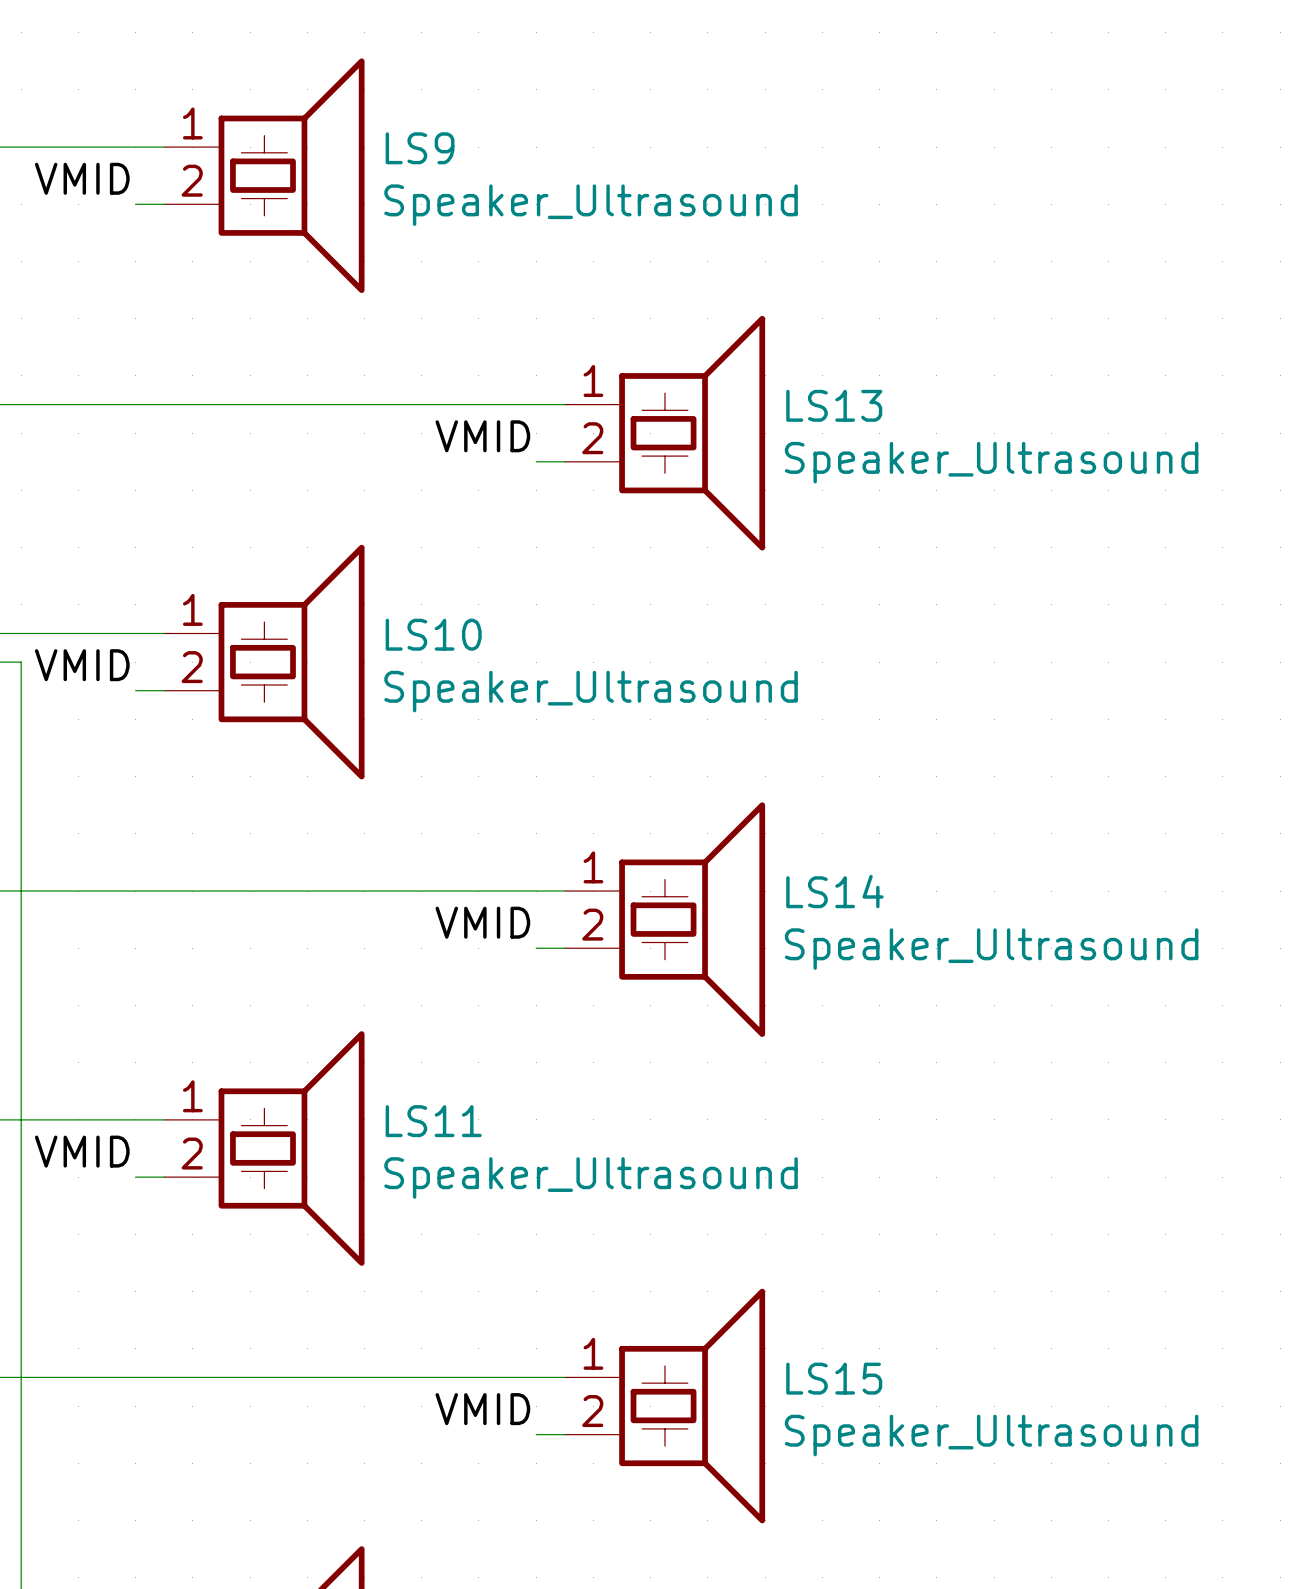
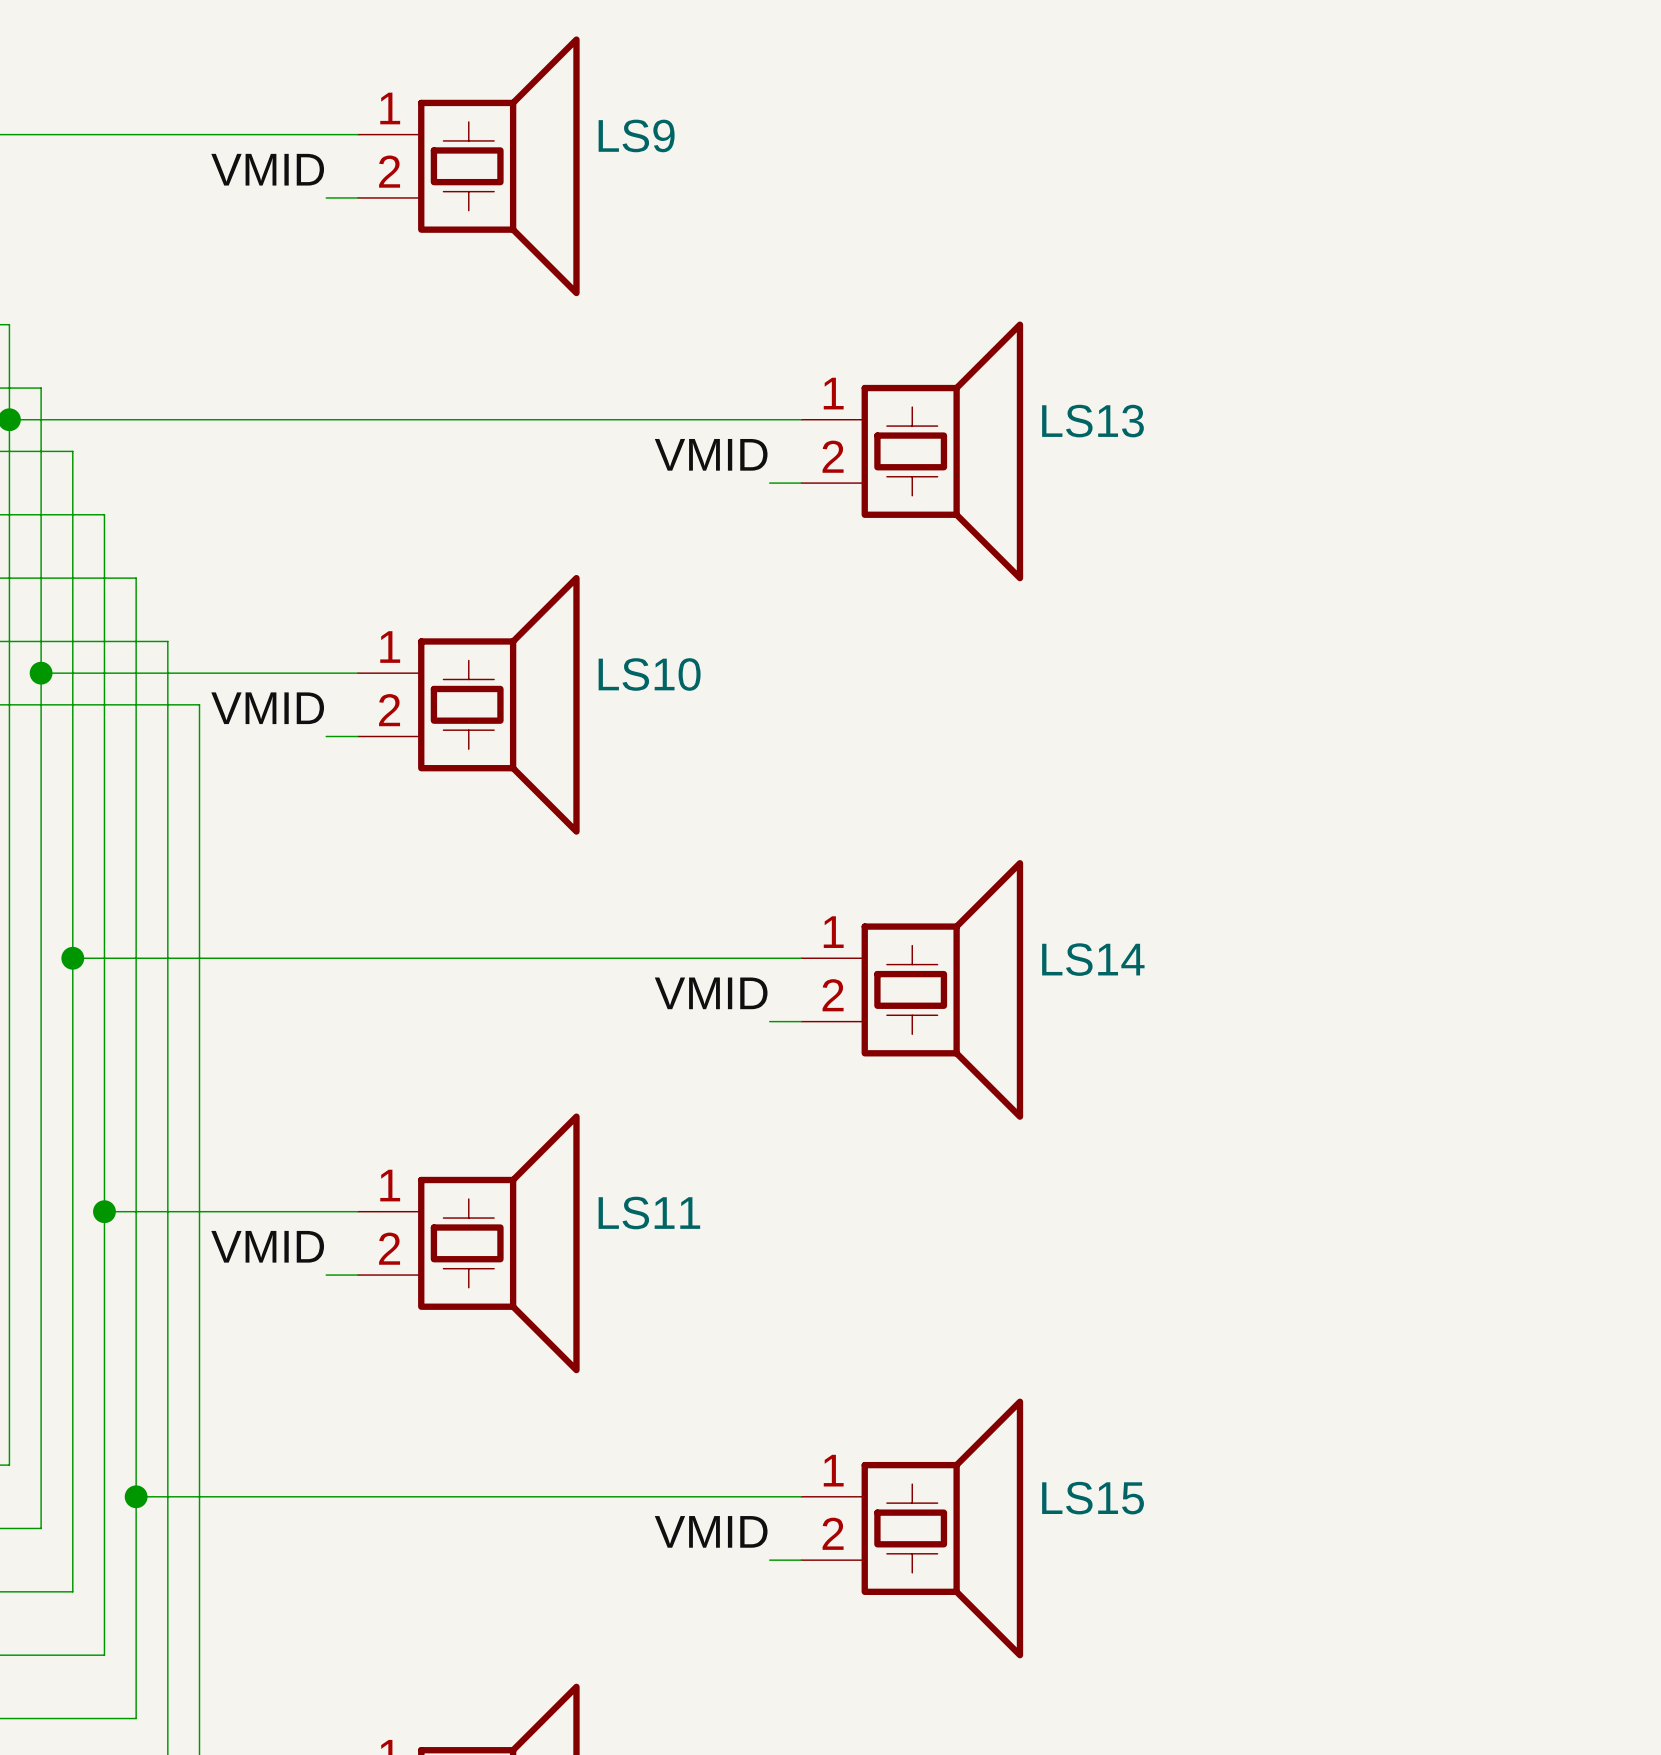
LS9 value: Speaker_Ultrasound (591, 205) -> none
LS13 value: Speaker_Ultrasound (991, 462) -> none
LS10 value: Speaker_Ultrasound (591, 691) -> none
LS14 value: Speaker_Ultrasound (991, 949) -> none
LS11 value: Speaker_Ultrasound (591, 1177) -> none
LS15 value: Speaker_Ultrasound (991, 1435) -> none

